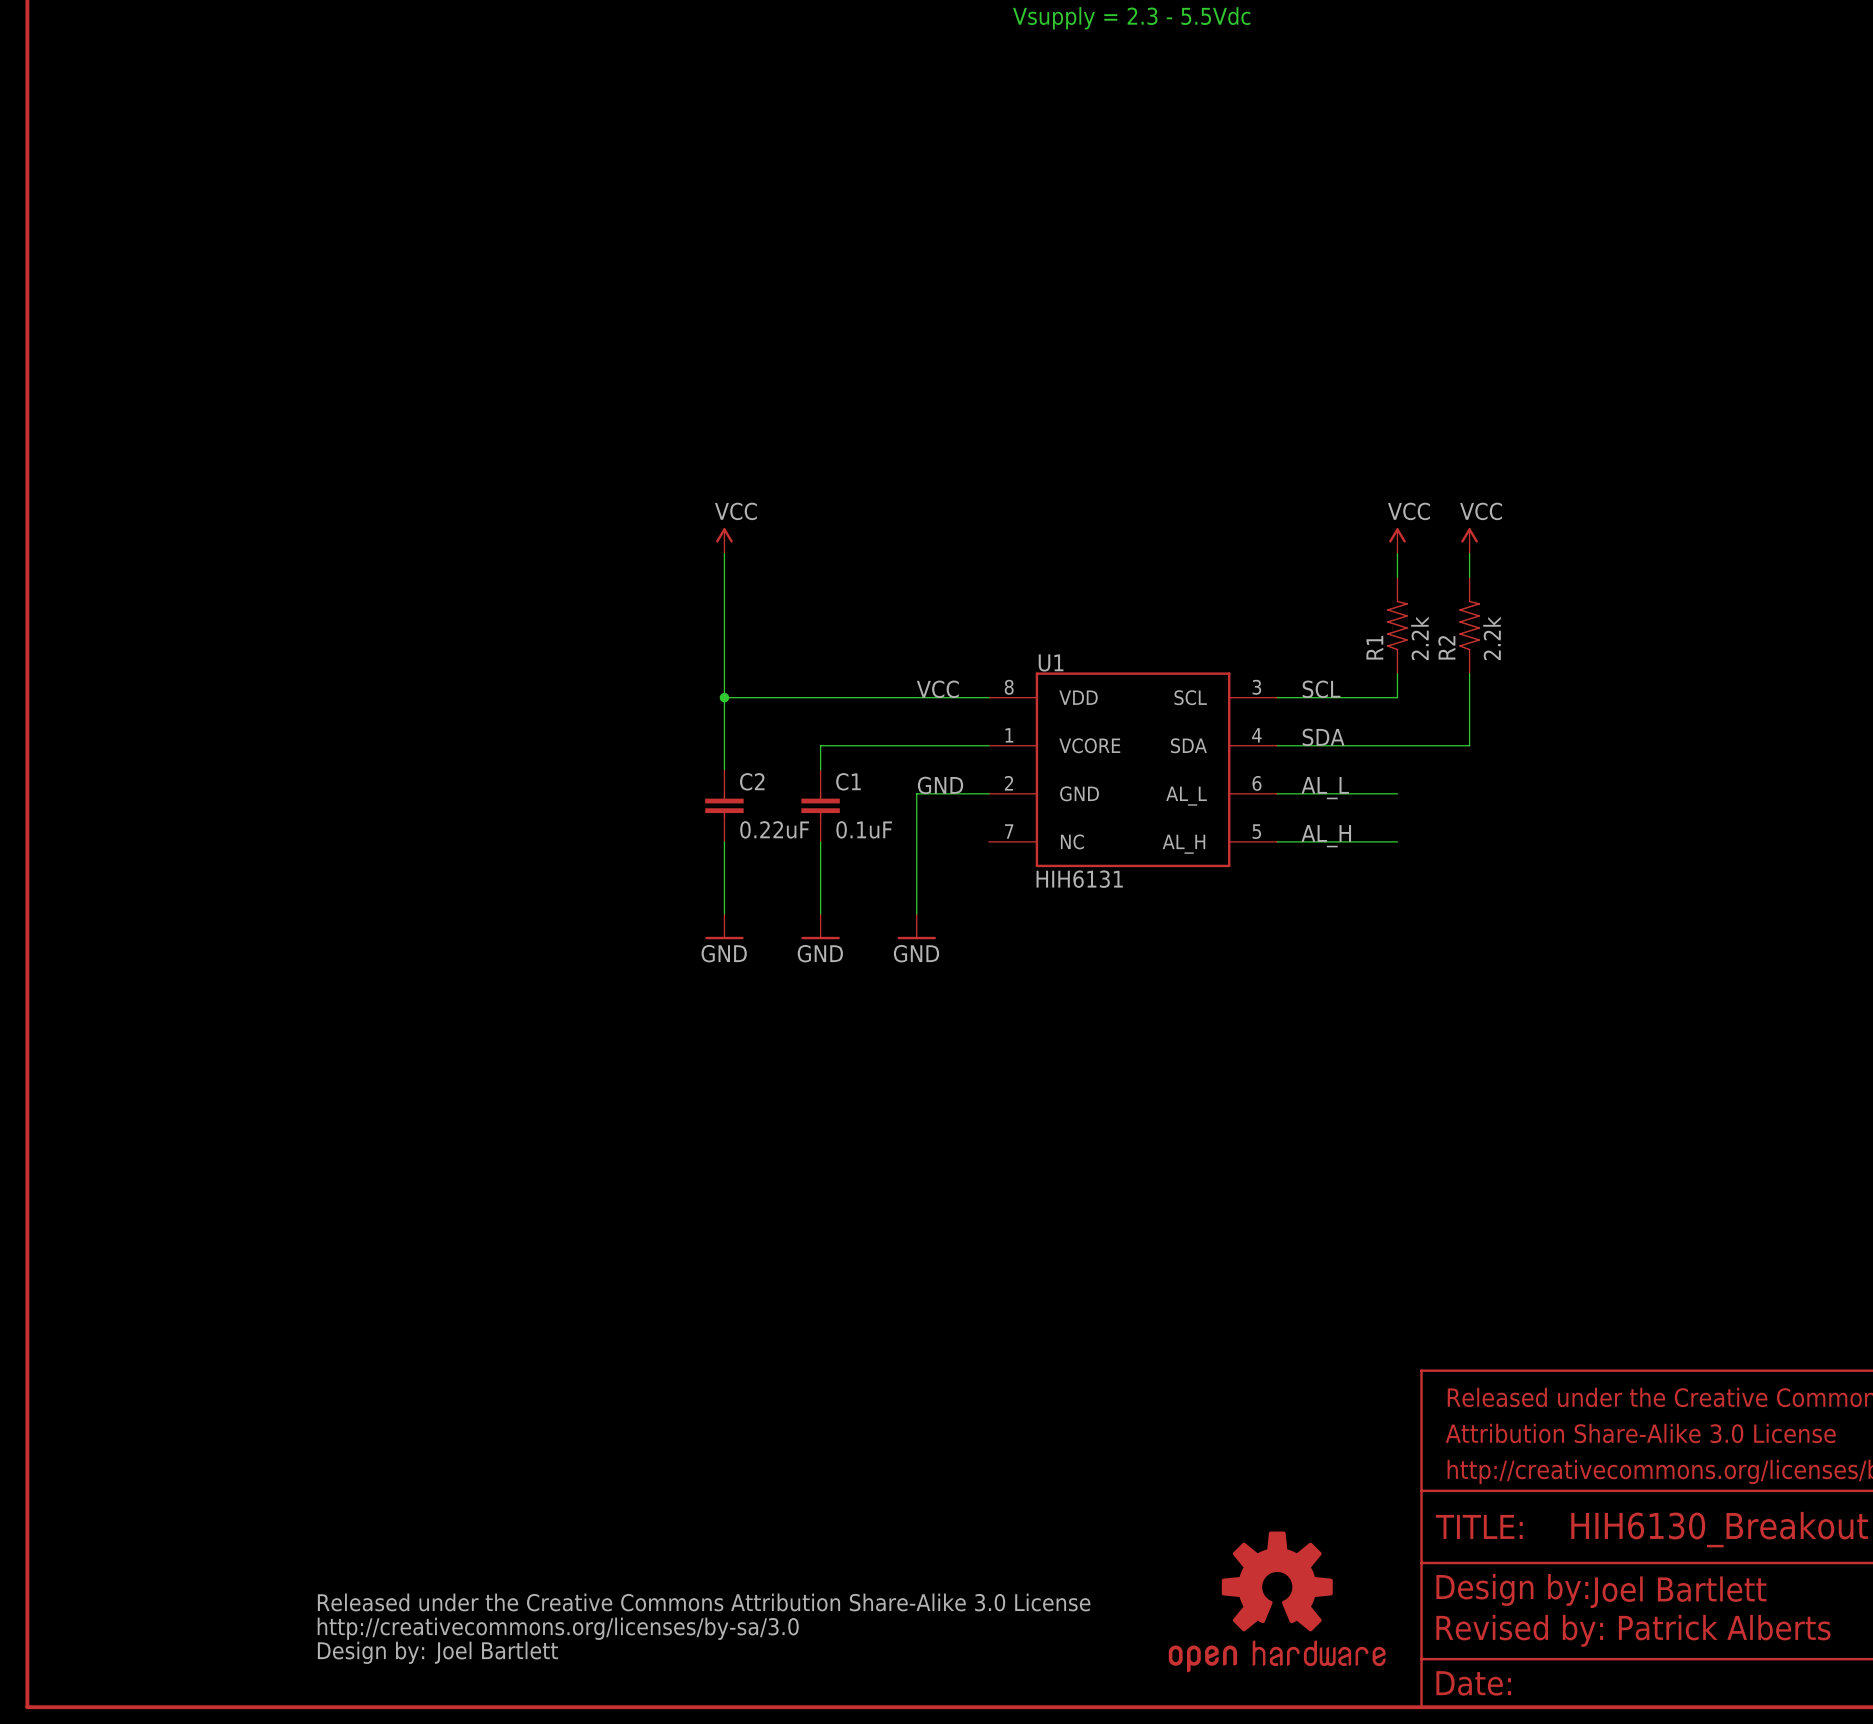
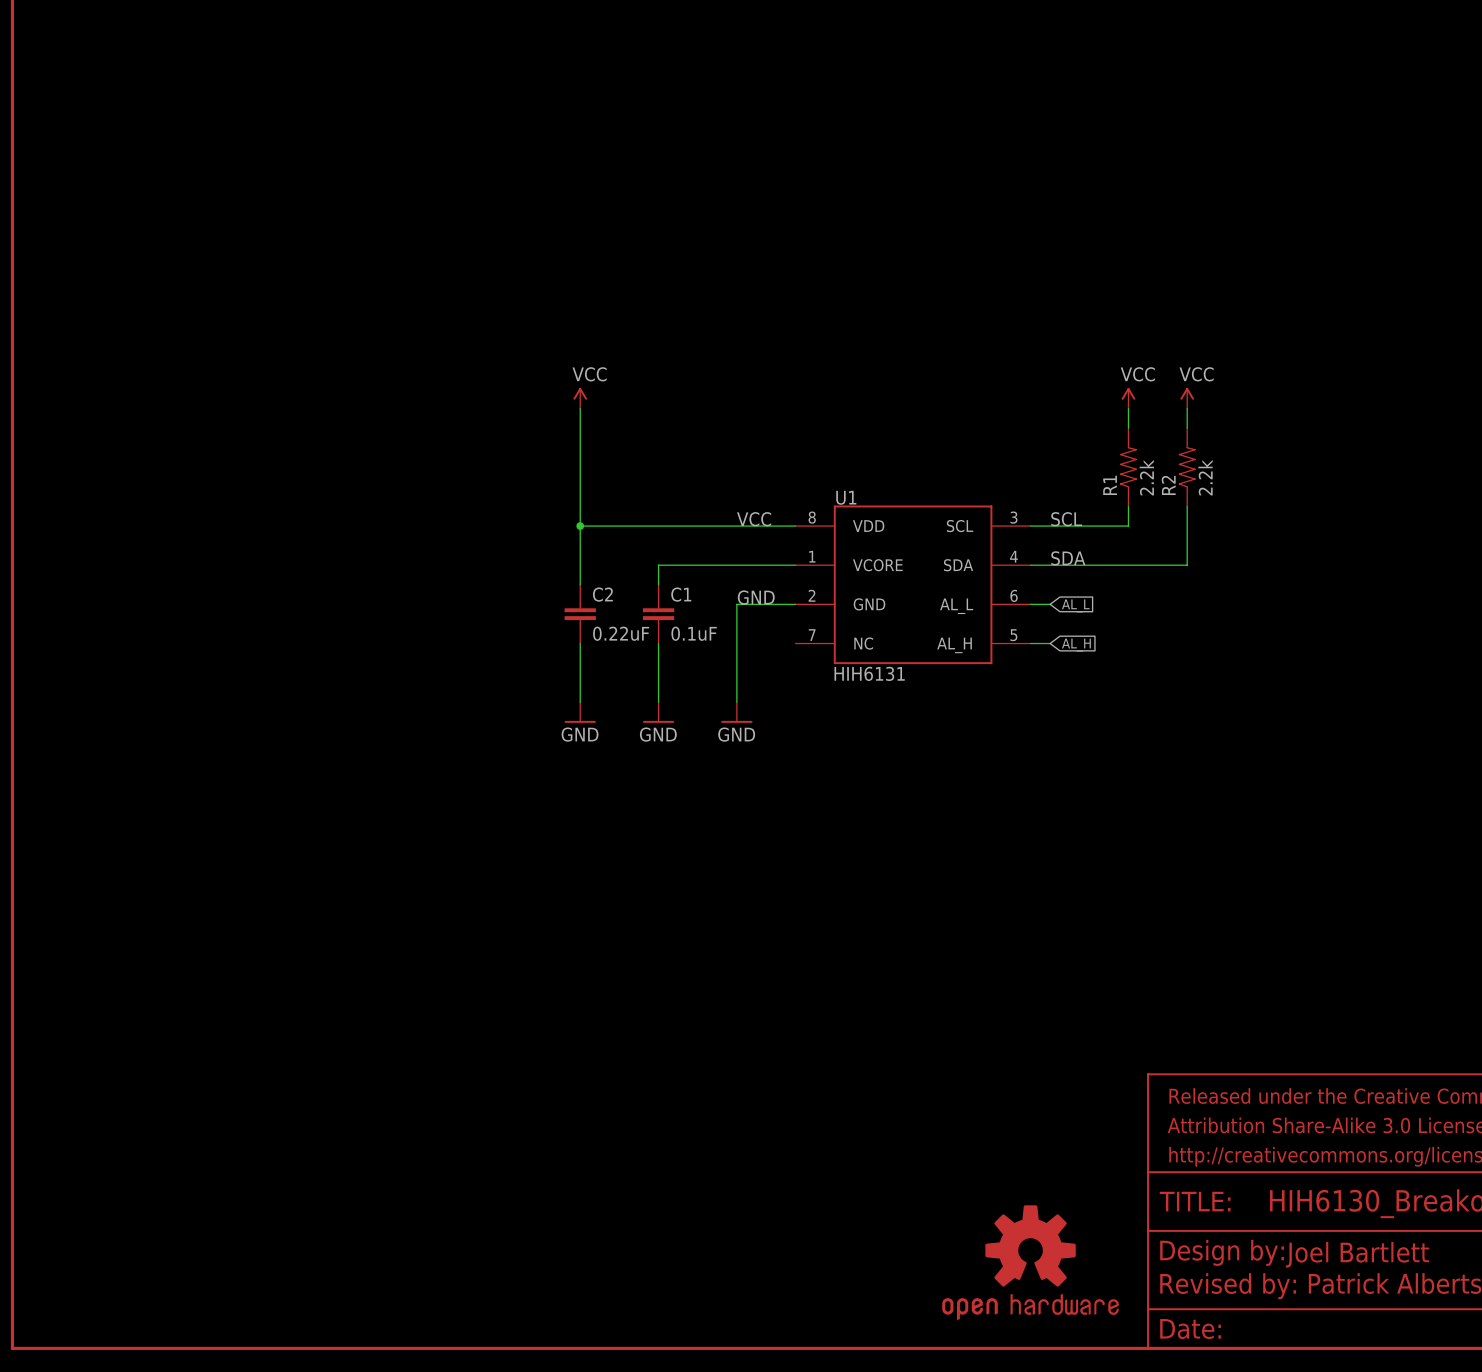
label: AL_L (1325, 788) -> none
wire: (1301, 793) (1397, 793) -> none
global label: none -> AL_L (1075, 605)
label: AL_H (1326, 836) -> none
wire: (1301, 841) (1397, 841) -> none
global label: none -> AL_H (1076, 645)
part: (704, 1628) -> none
text: Joel Bartlett (496, 1652) -> none

